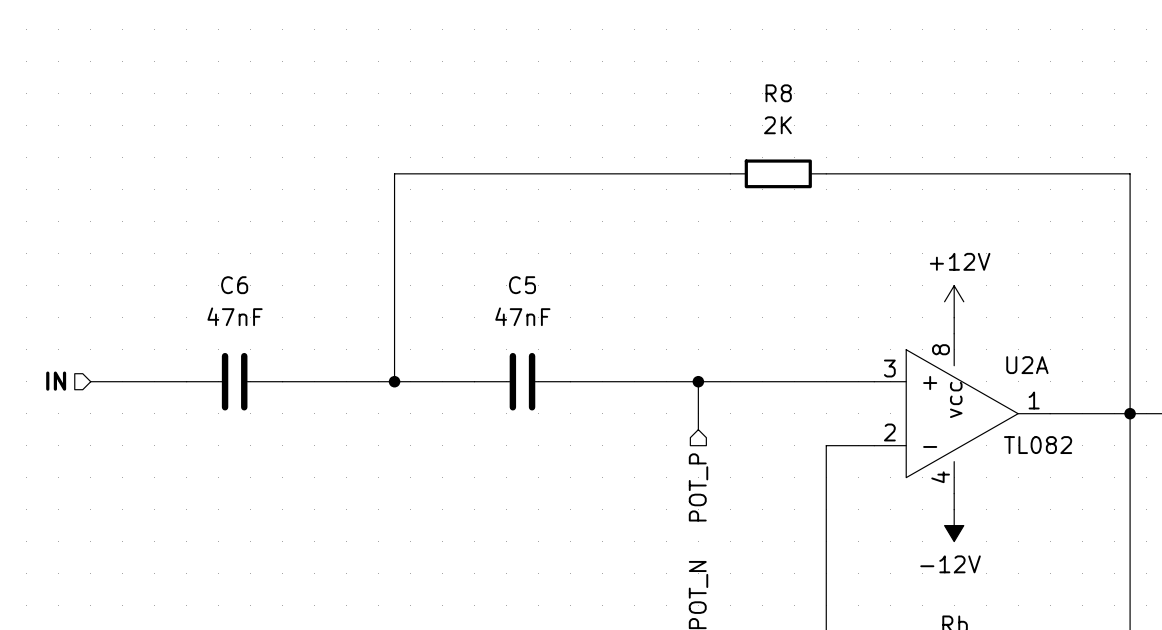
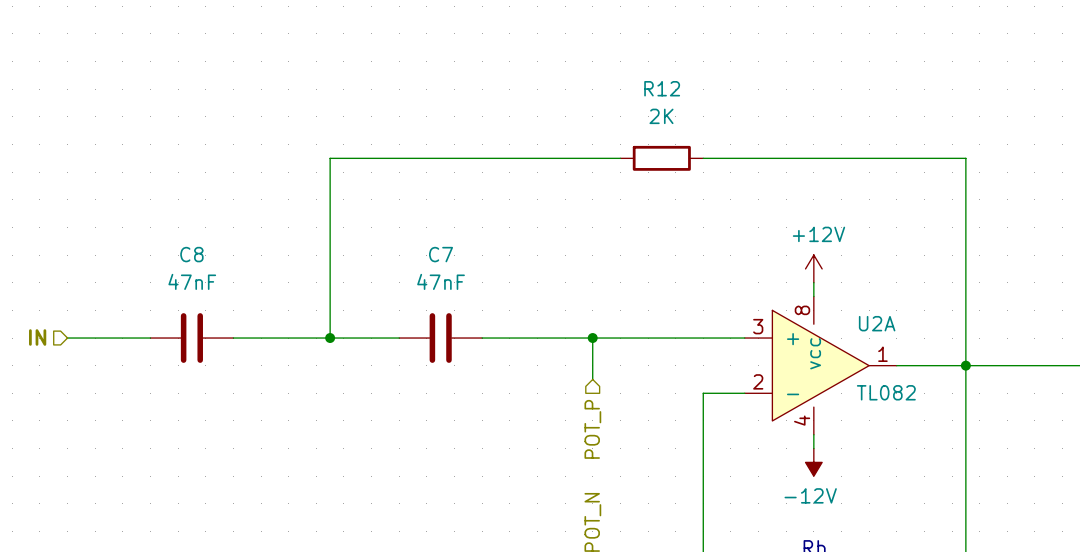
R8 name: R8 (778, 93) -> R12 (662, 88)
C6 name: C6 (234, 285) -> C8 (191, 254)
C5 name: C5 (522, 285) -> C7 (441, 254)

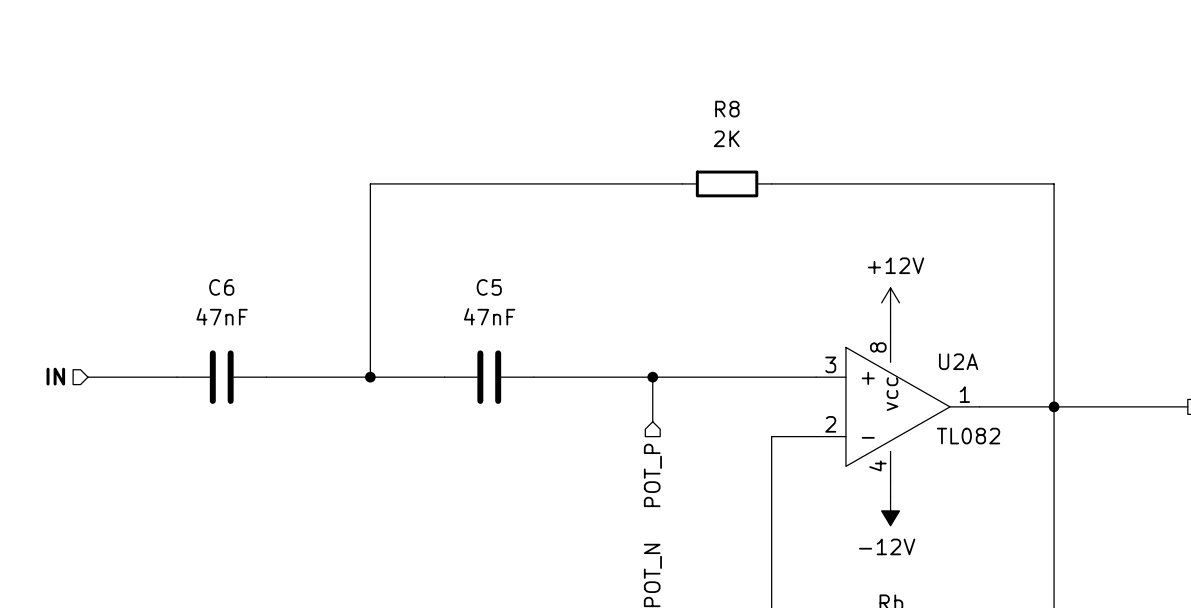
R12 name: R12 (662, 88) -> R8 (727, 109)
C8 name: C8 (191, 254) -> C6 (221, 287)
C7 name: C7 (441, 254) -> C5 (489, 287)

